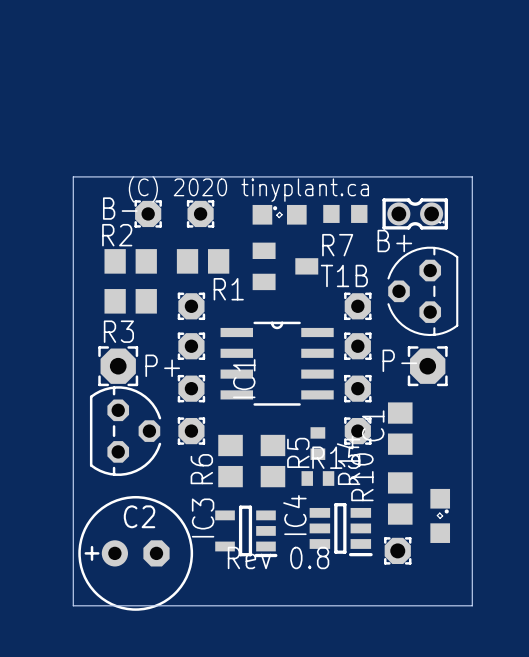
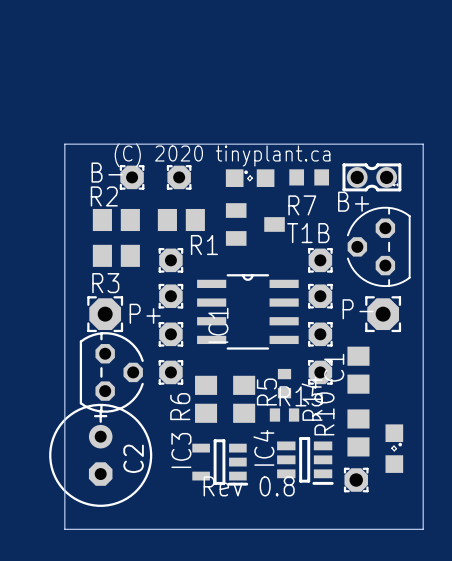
C2 rotation: 0° (135, 553) -> 90° clockwise (100, 455)

